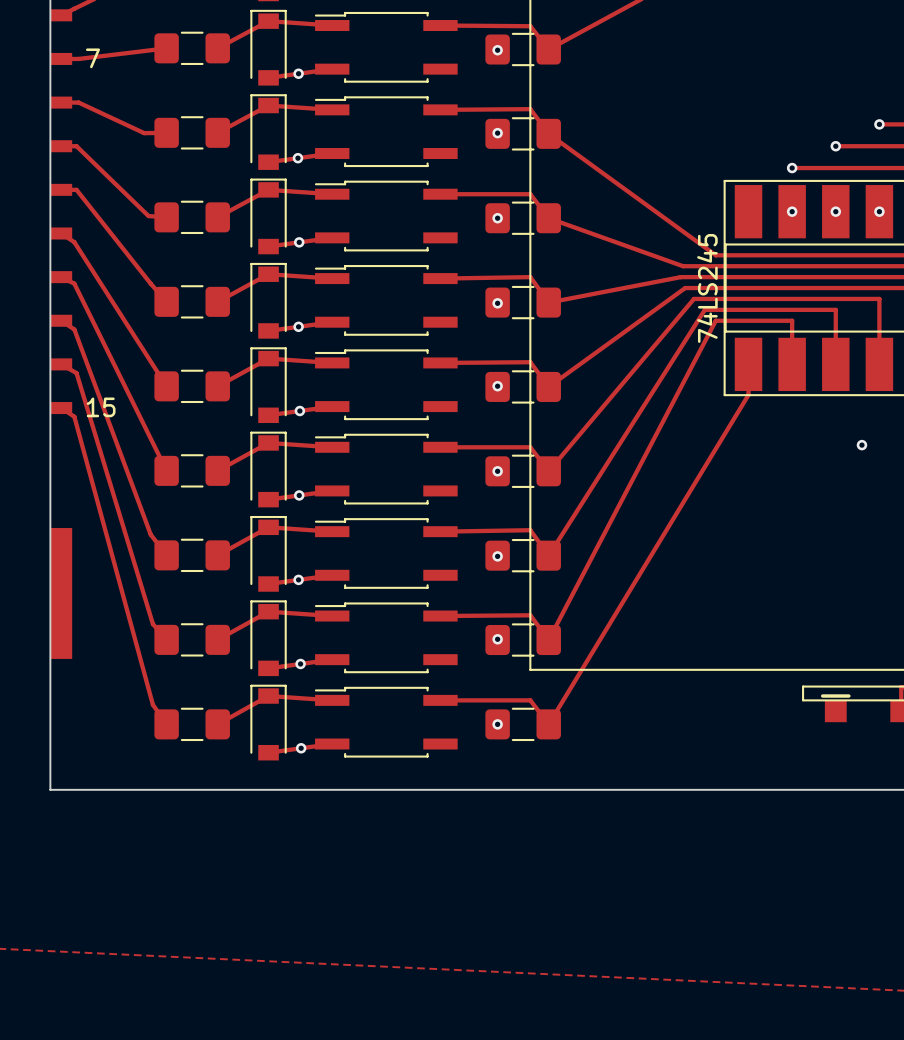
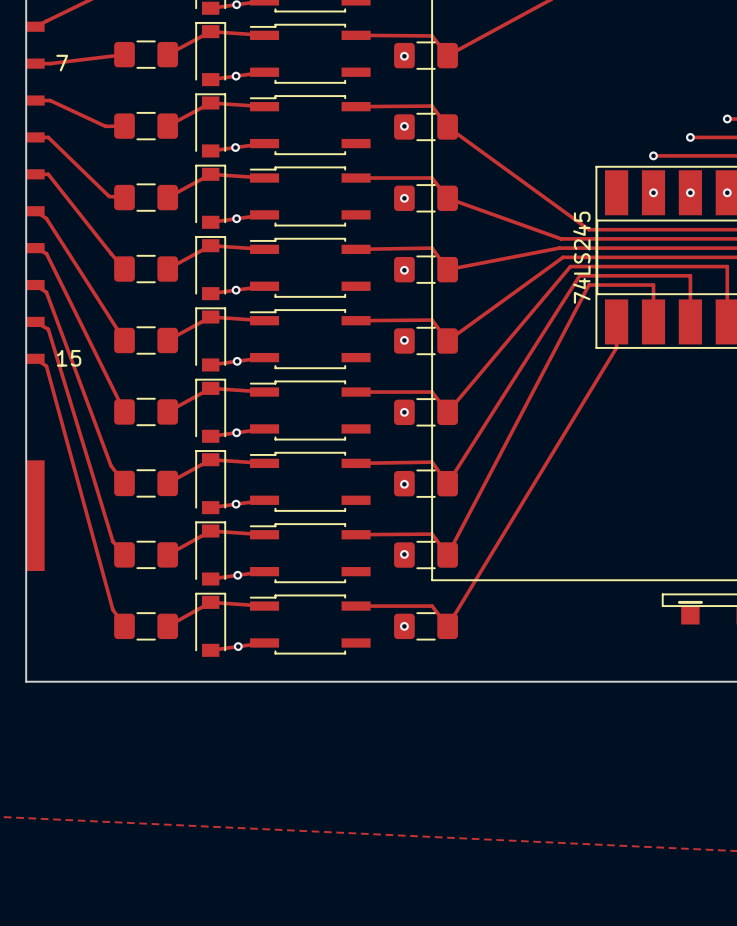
via: (861, 445) -> none

